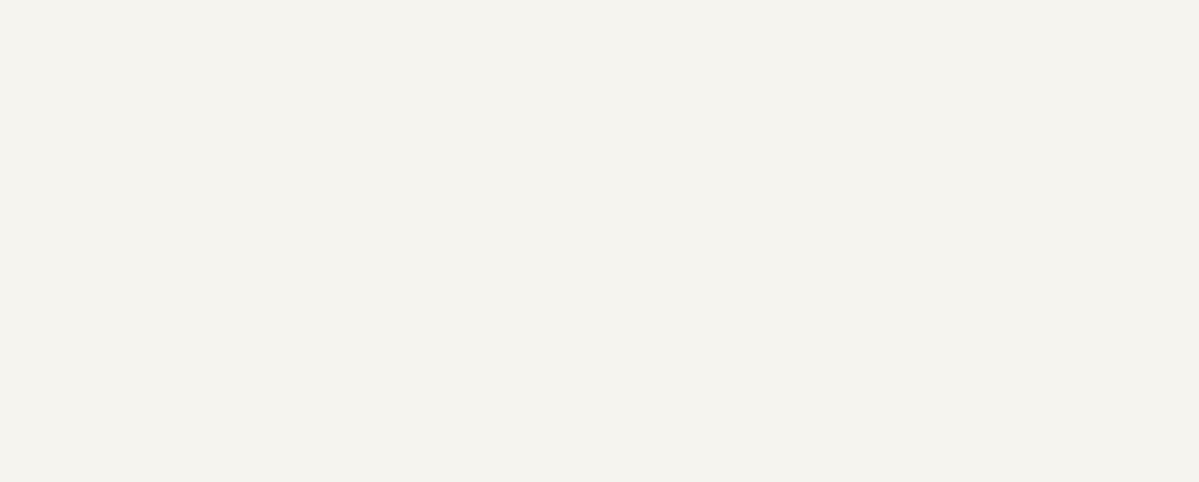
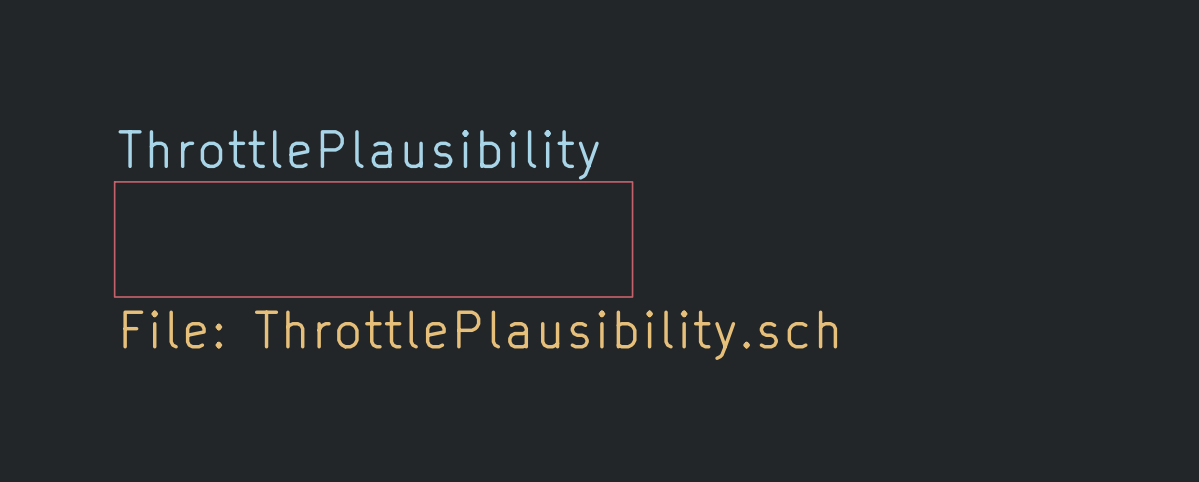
sheet ThrottlePlausibility: none -> File: ThrottlePlausibility.sch (373, 239)

